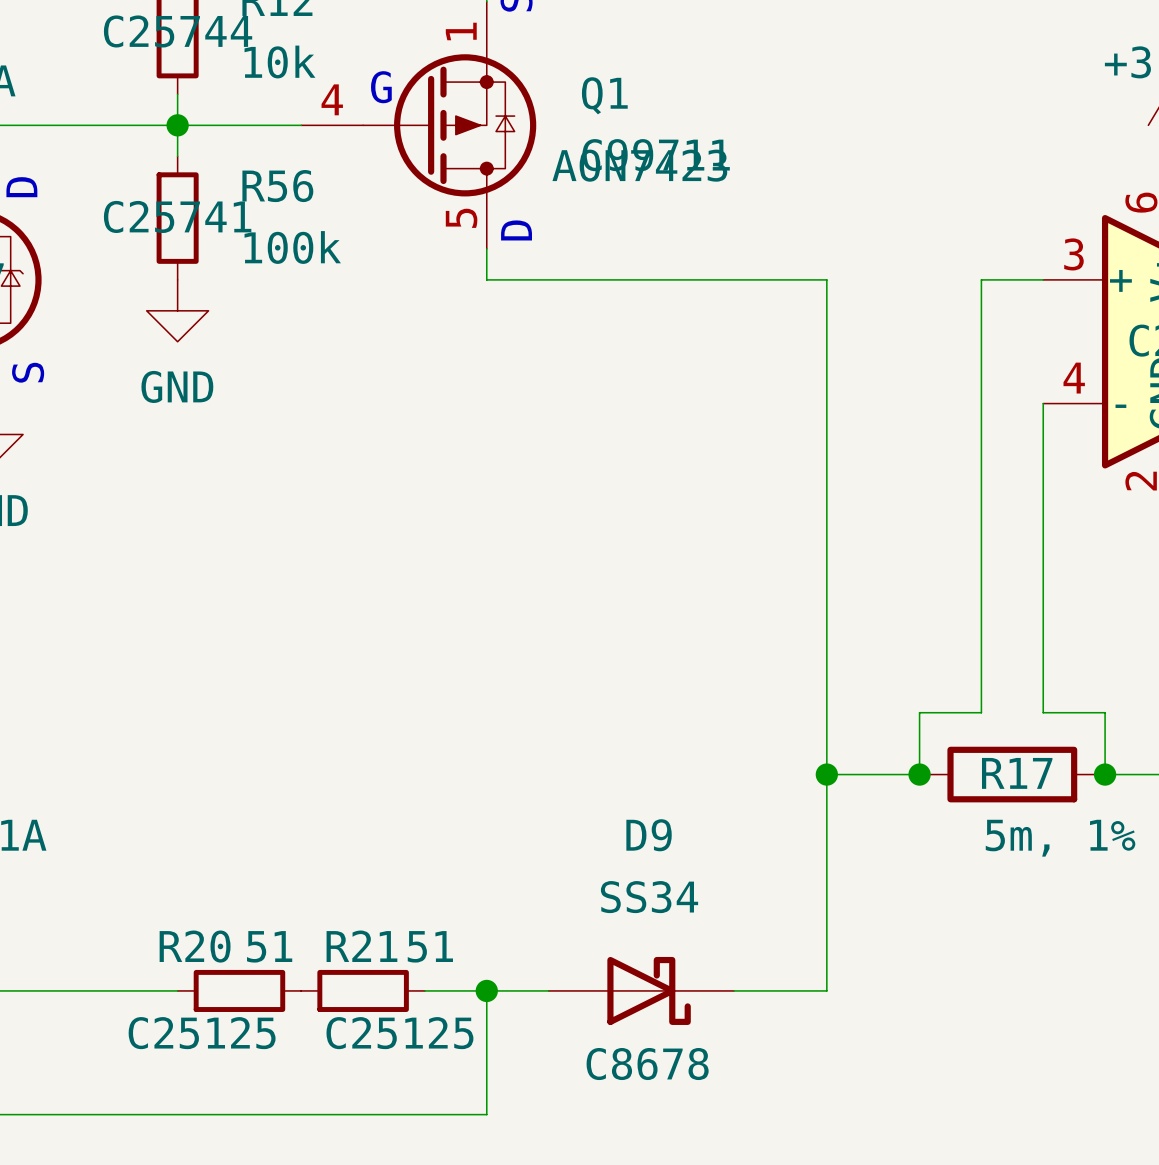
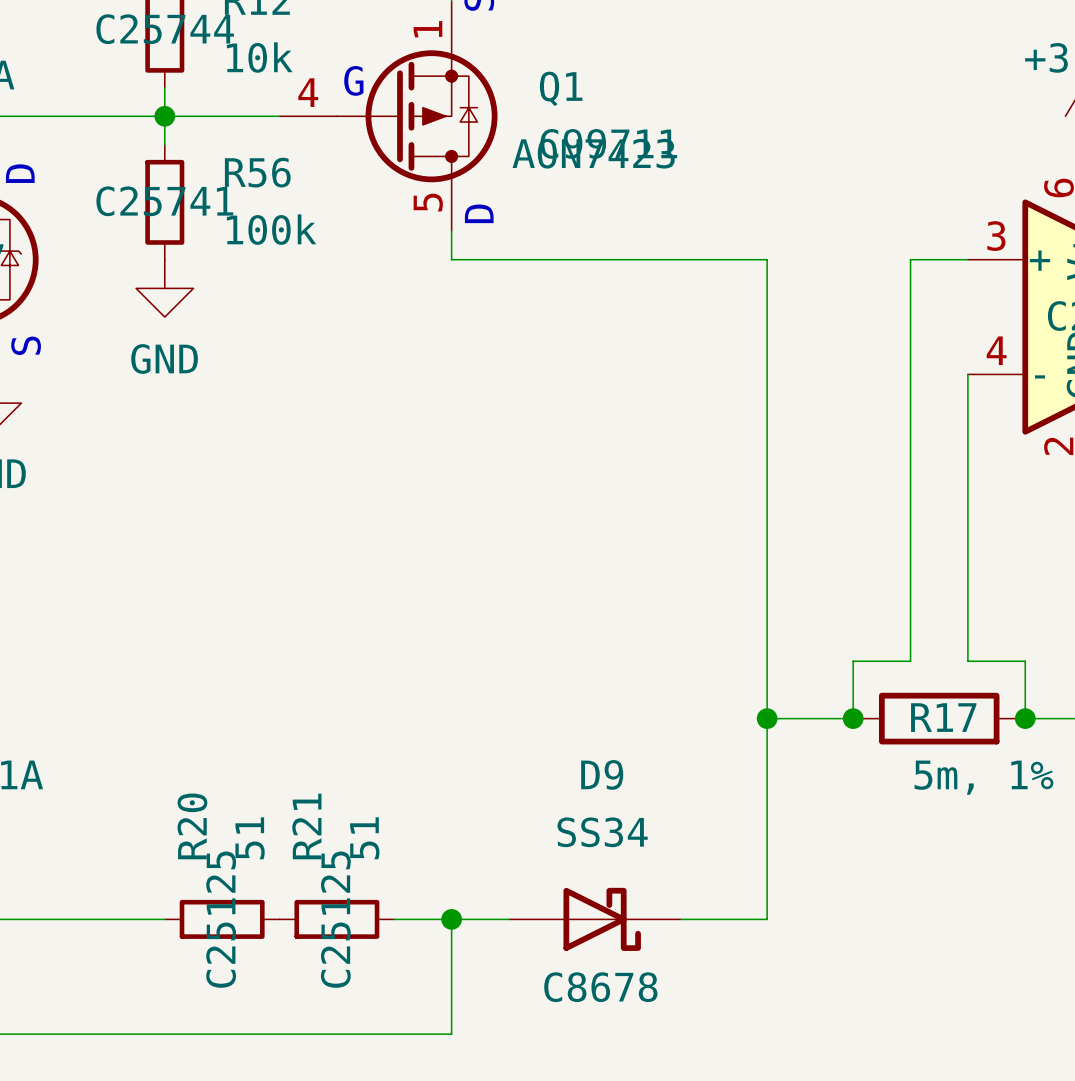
R20 name rotation: 0° (195, 946) -> 90° counterclockwise (192, 826)
R20 value rotation: 0° (269, 946) -> 90° counterclockwise (250, 838)
R21 name rotation: 0° (361, 946) -> 90° counterclockwise (306, 826)
R21 value rotation: 0° (430, 946) -> 90° counterclockwise (364, 838)
R20 text rotation: 0° (202, 1033) -> 90° counterclockwise (221, 919)
R21 text rotation: 0° (399, 1033) -> 90° counterclockwise (335, 919)

